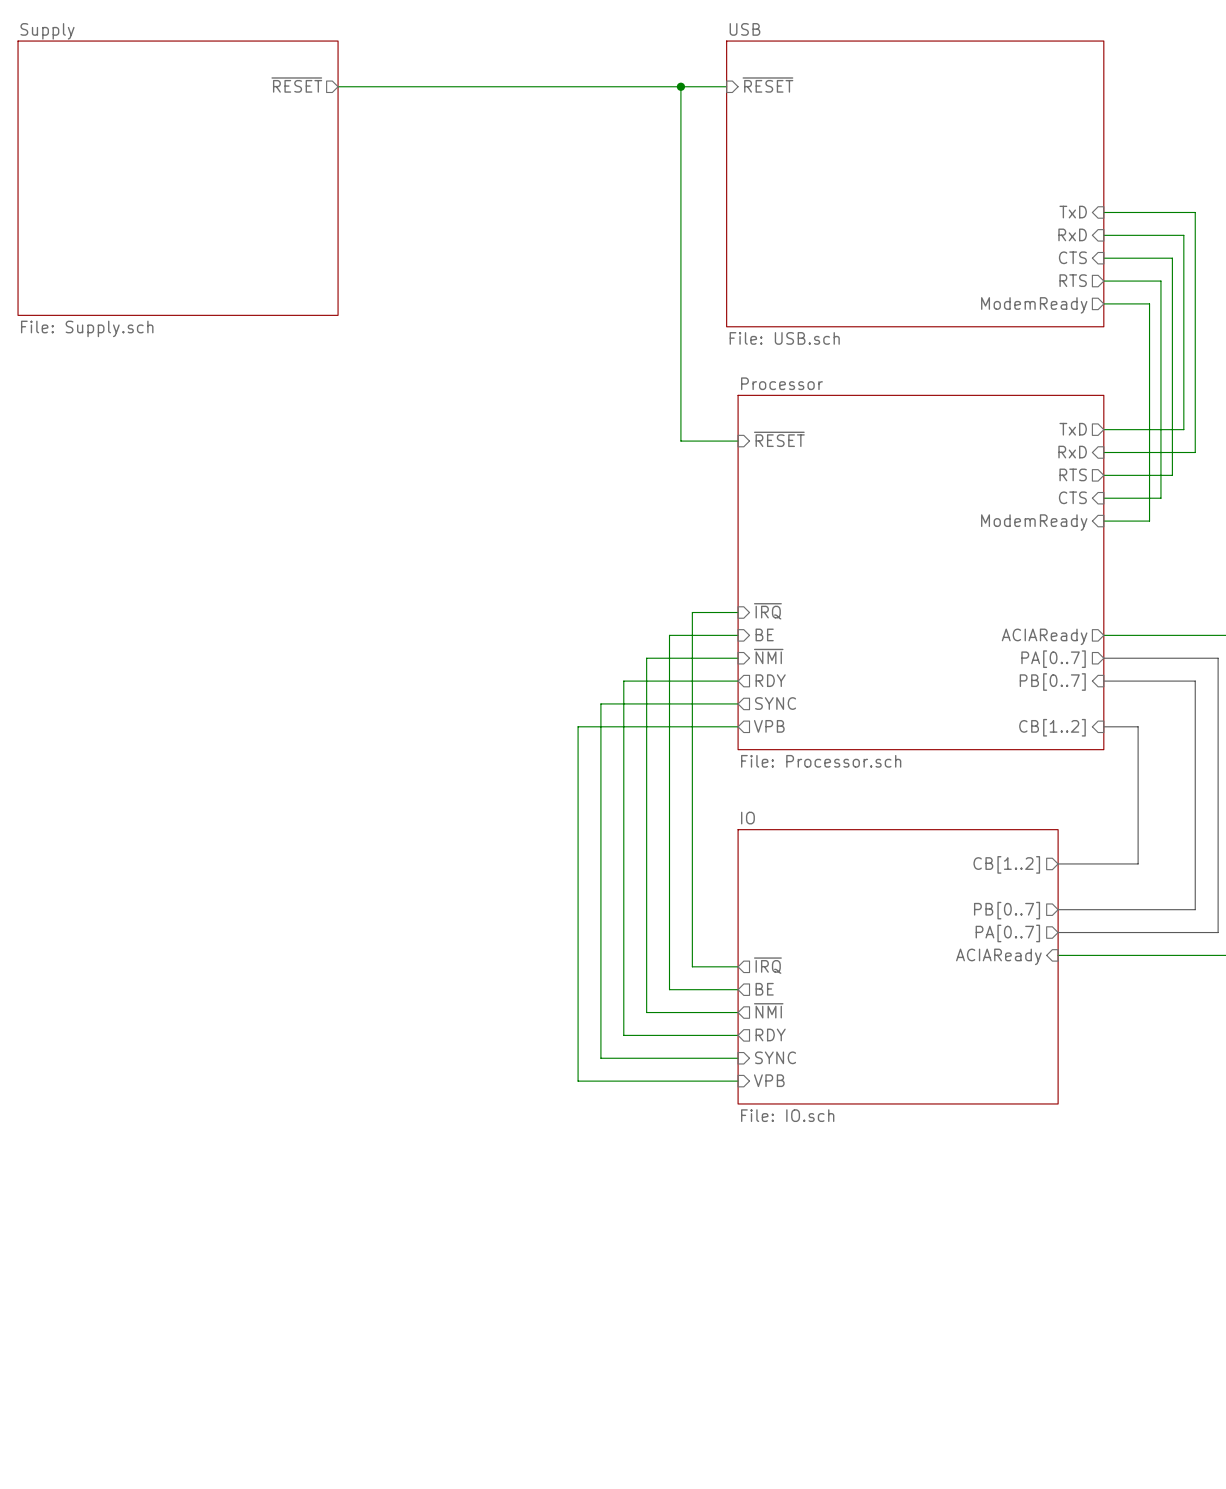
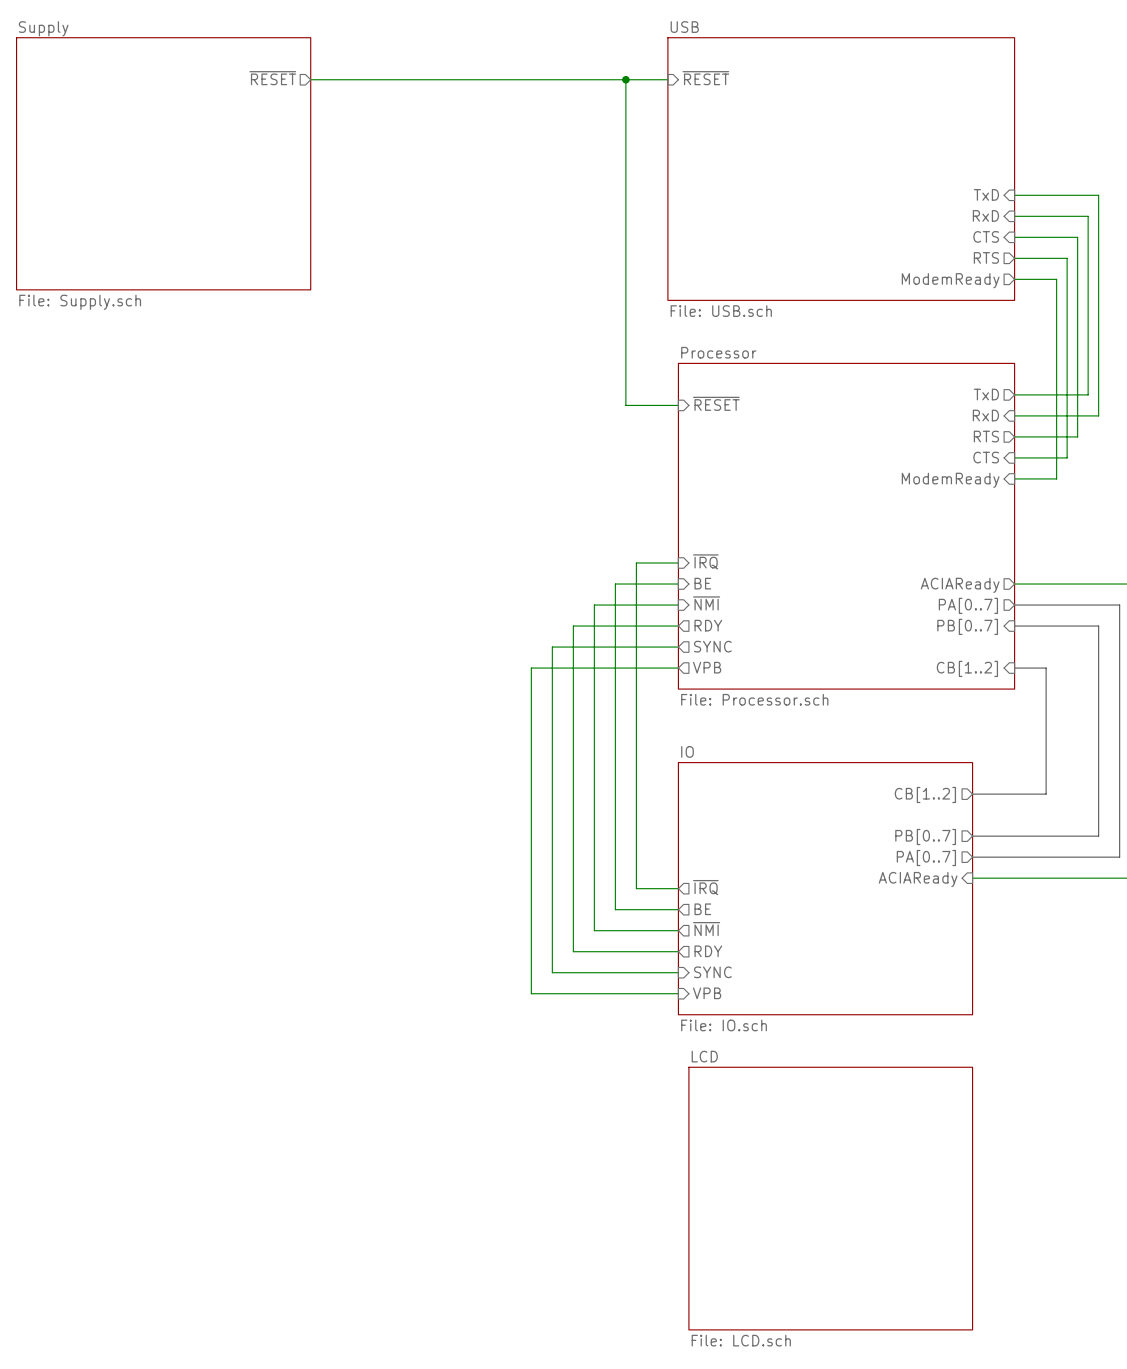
sheet LCD: none -> File: LCD.sch (830, 1198)

